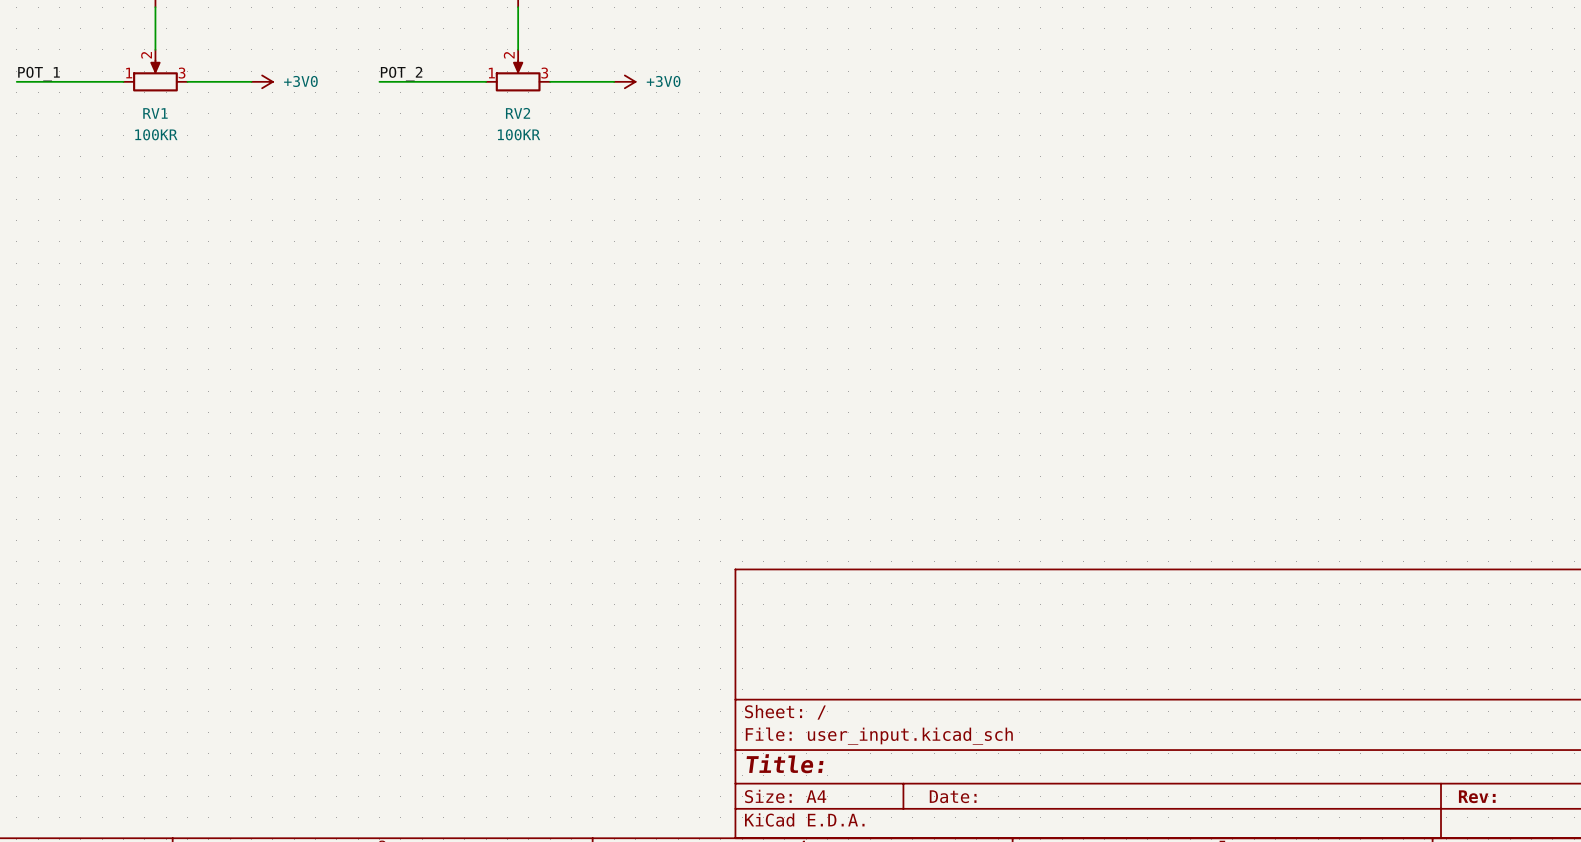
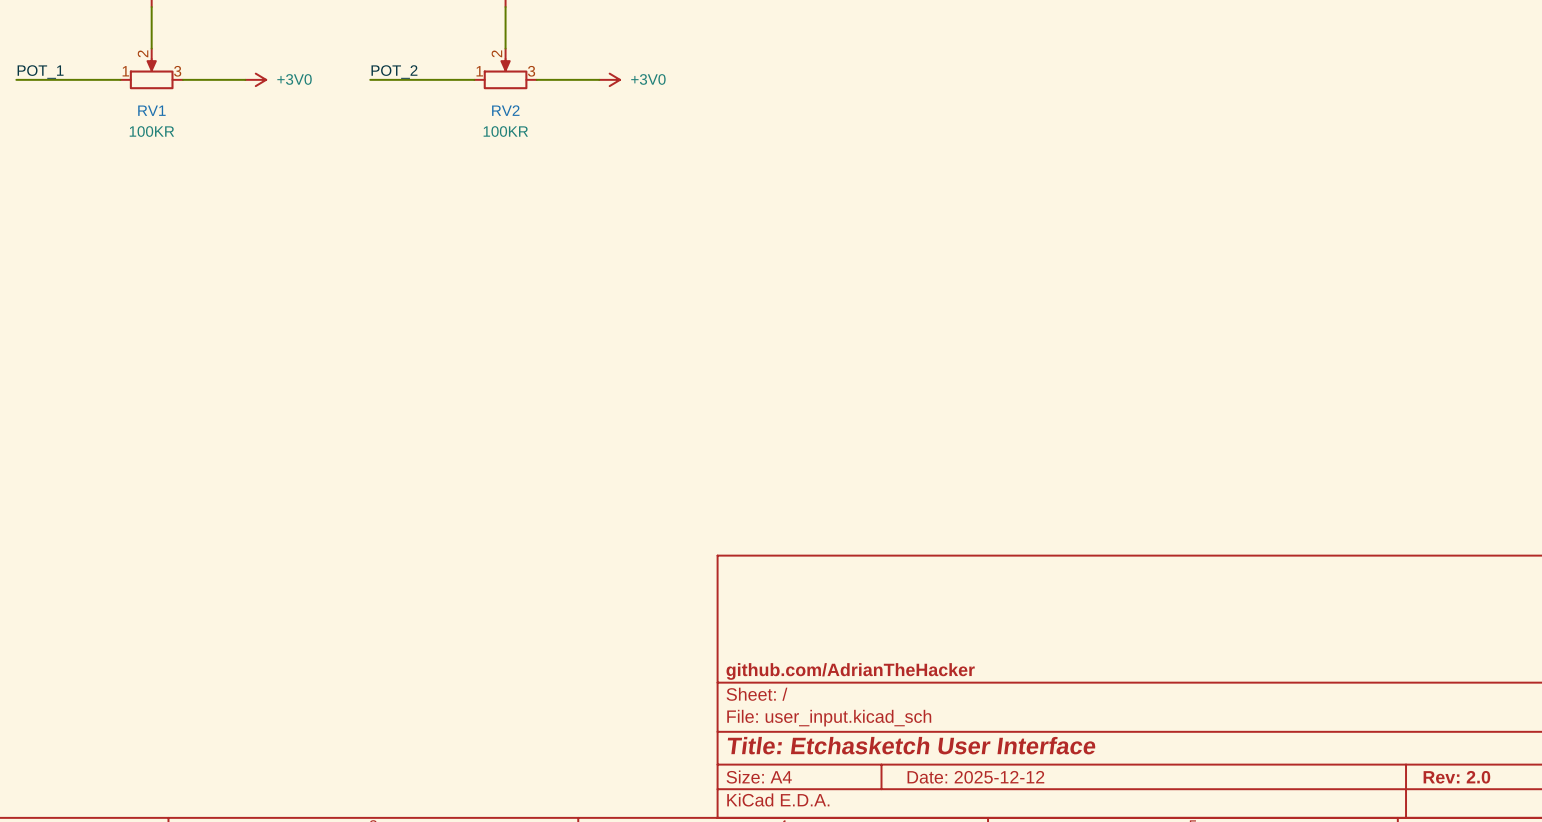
title block: none -> github.com/AdrianTheHacker (850, 671)
title block: Title: (785, 763) -> Title: Etchasketch User Interface (911, 745)
title block: Date: (953, 796) -> Date: 2025-12-12 (975, 777)
title block: Rev: (1477, 796) -> Rev: 2.0 (1456, 777)

